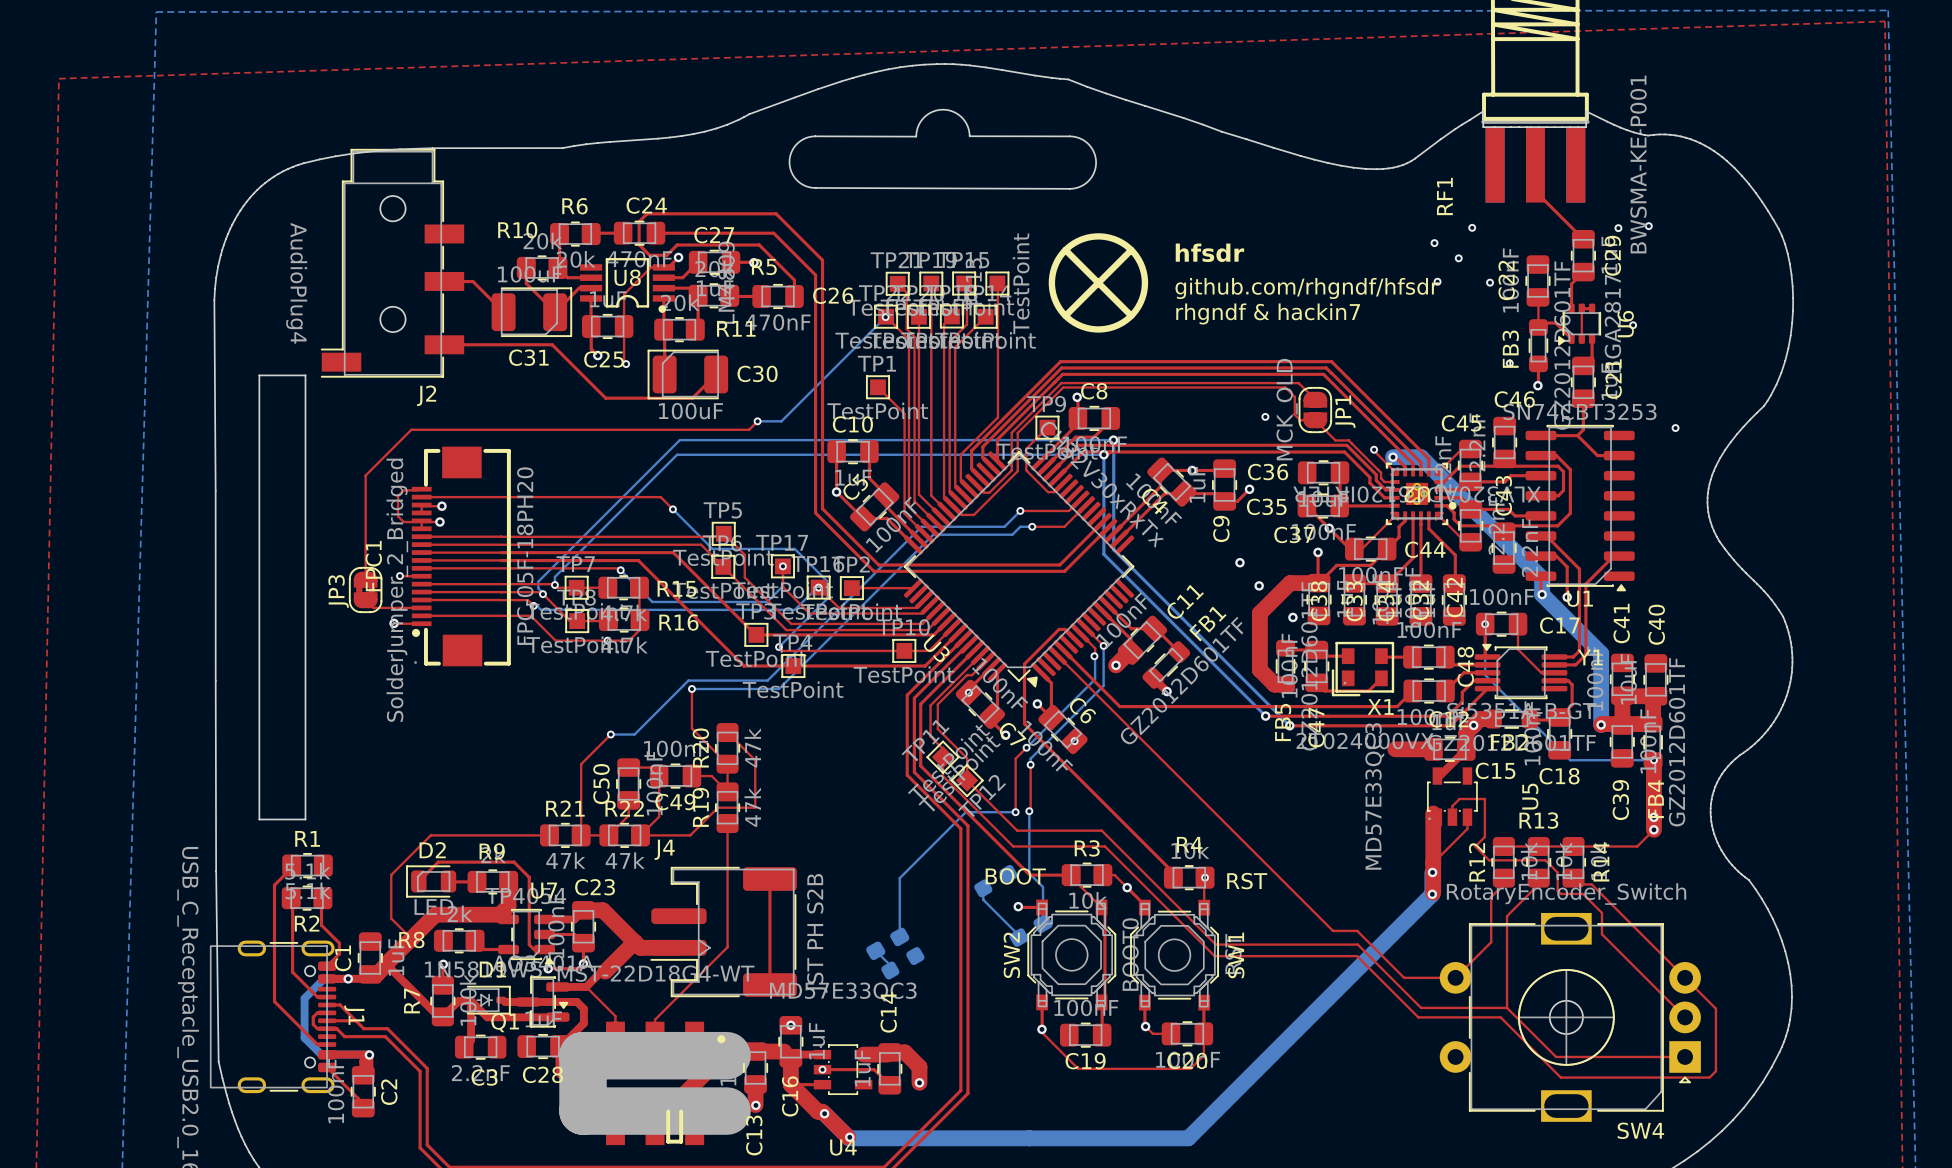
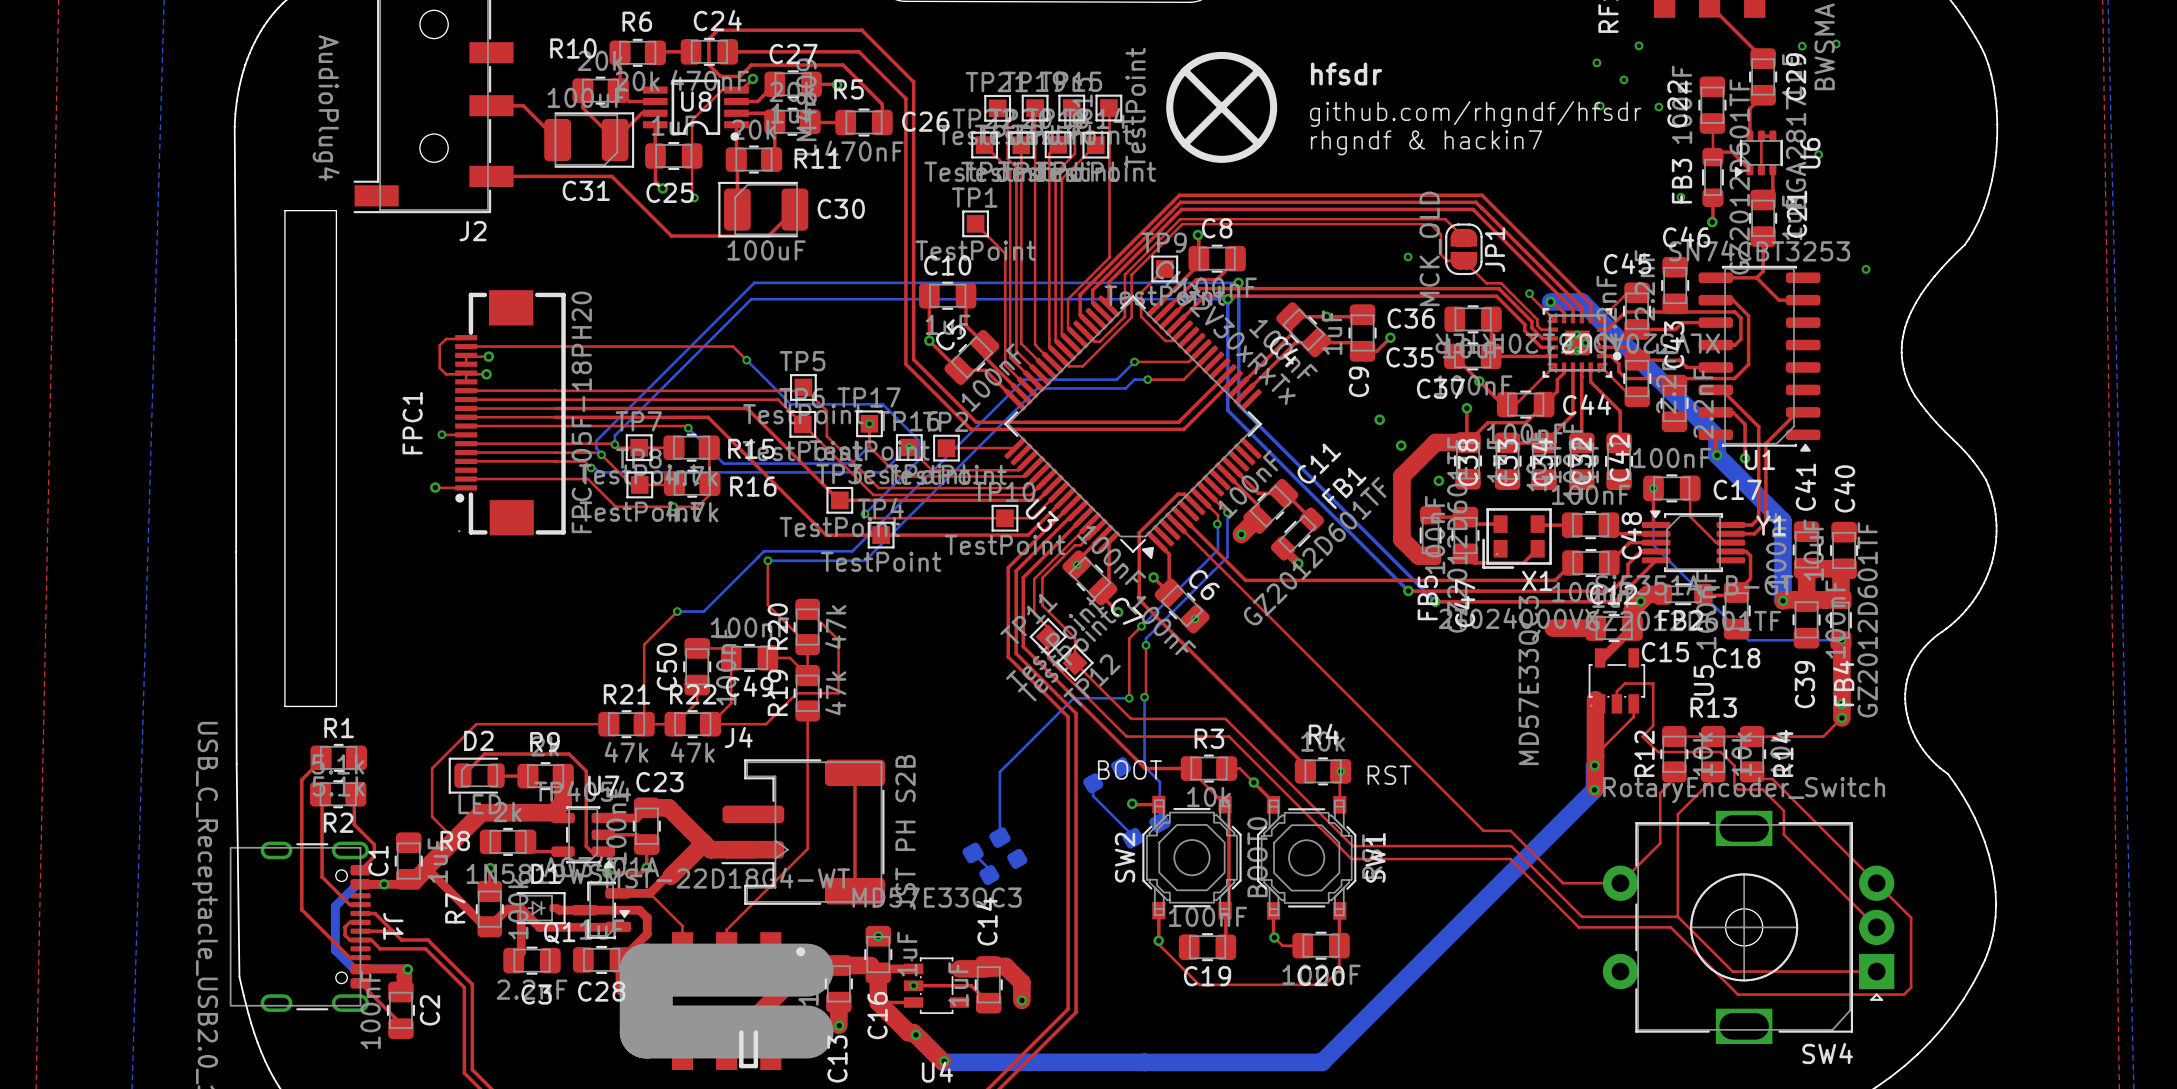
bottom track: (885, 317) (781, 421) (757, 421) -> none
via: (885, 317) -> none
top track: (757, 421) (749, 429) (411, 429) (365, 475) (365, 579) -> none
via: (757, 421) -> none
JP3: SolderJumper_2_Bridged (365, 589) -> none
top track: (365, 600) (373, 607) (421, 607) -> none

